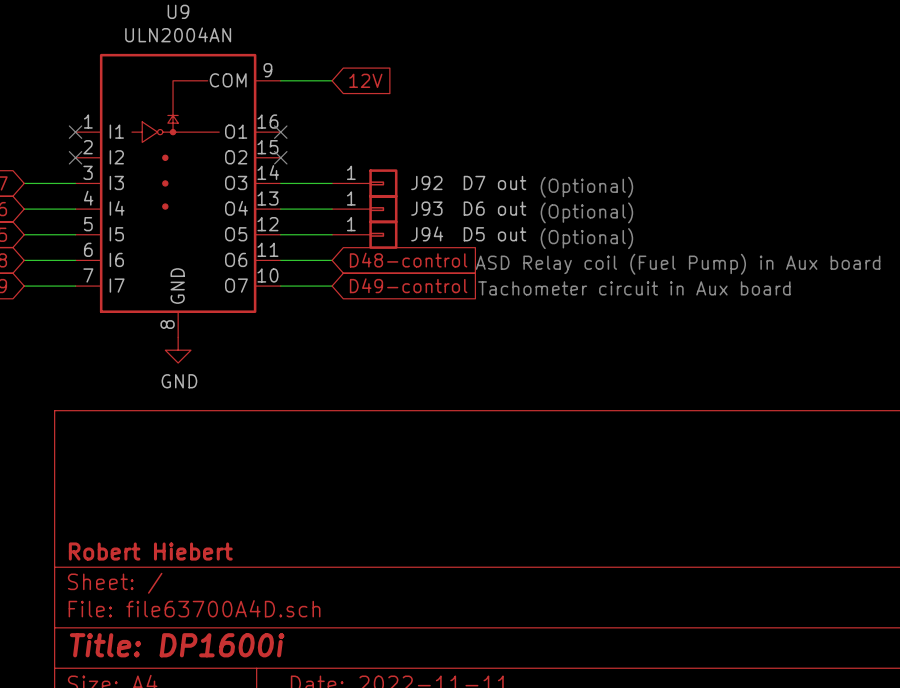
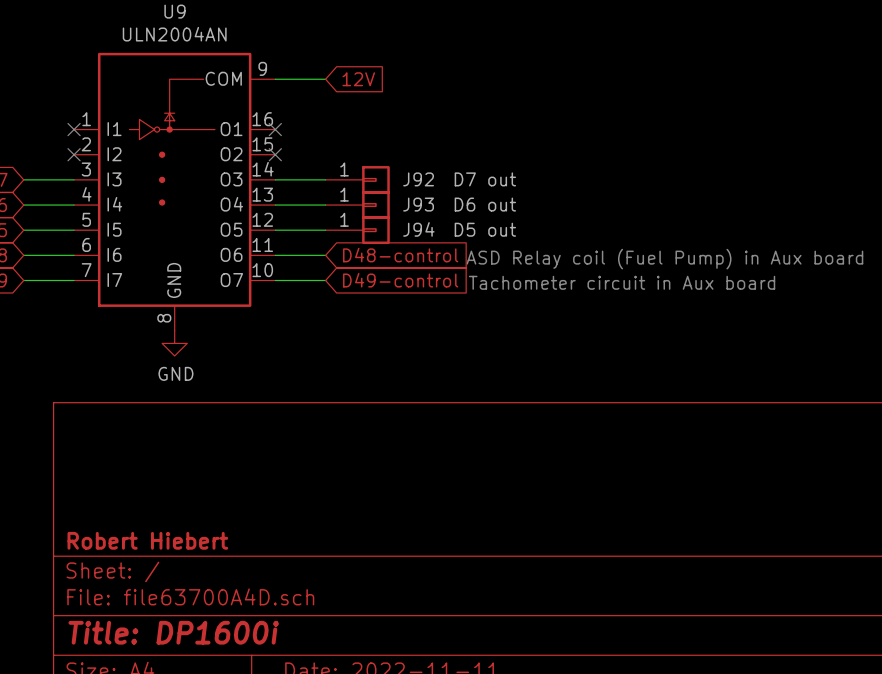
text: (Optional) (586, 187) -> none
text: (Optional) (586, 212) -> none
text: (Optional) (586, 238) -> none

